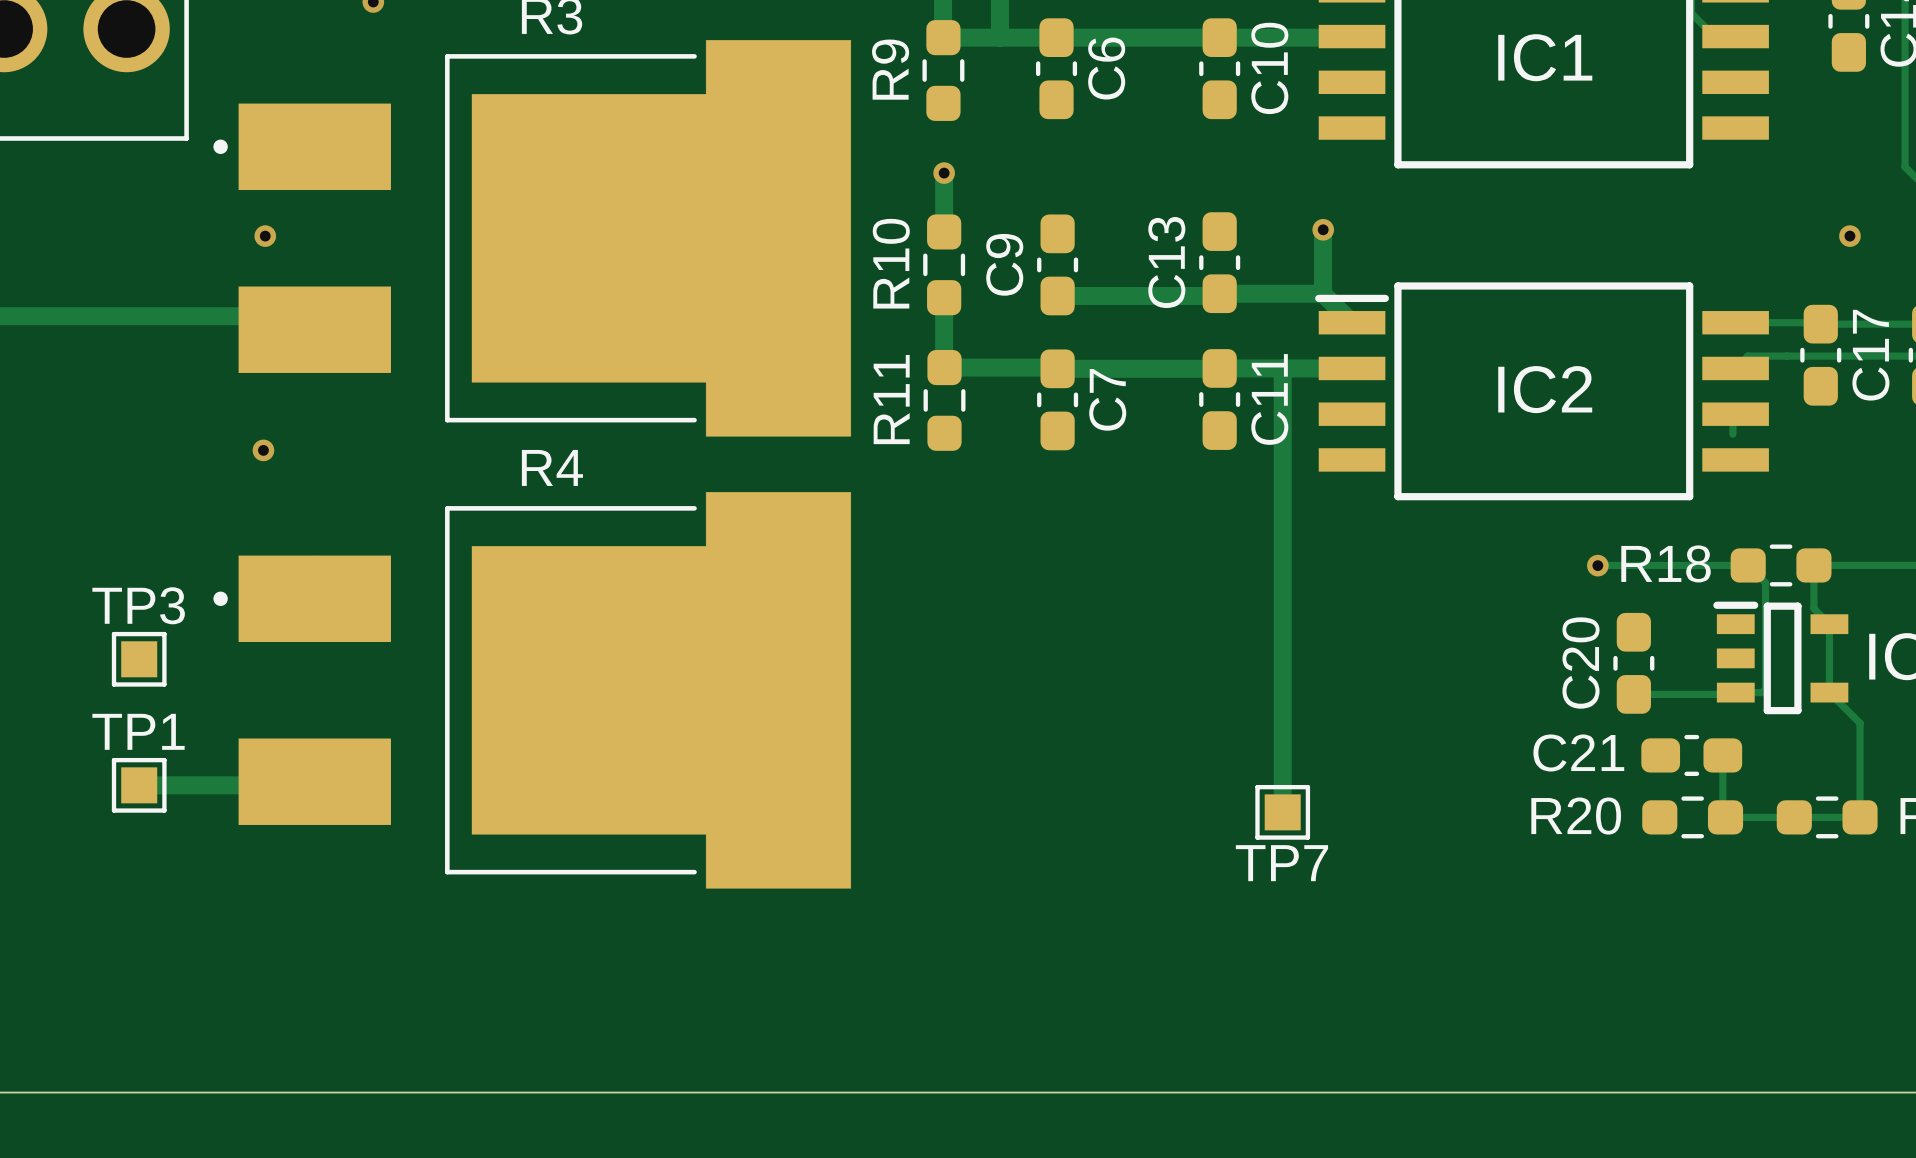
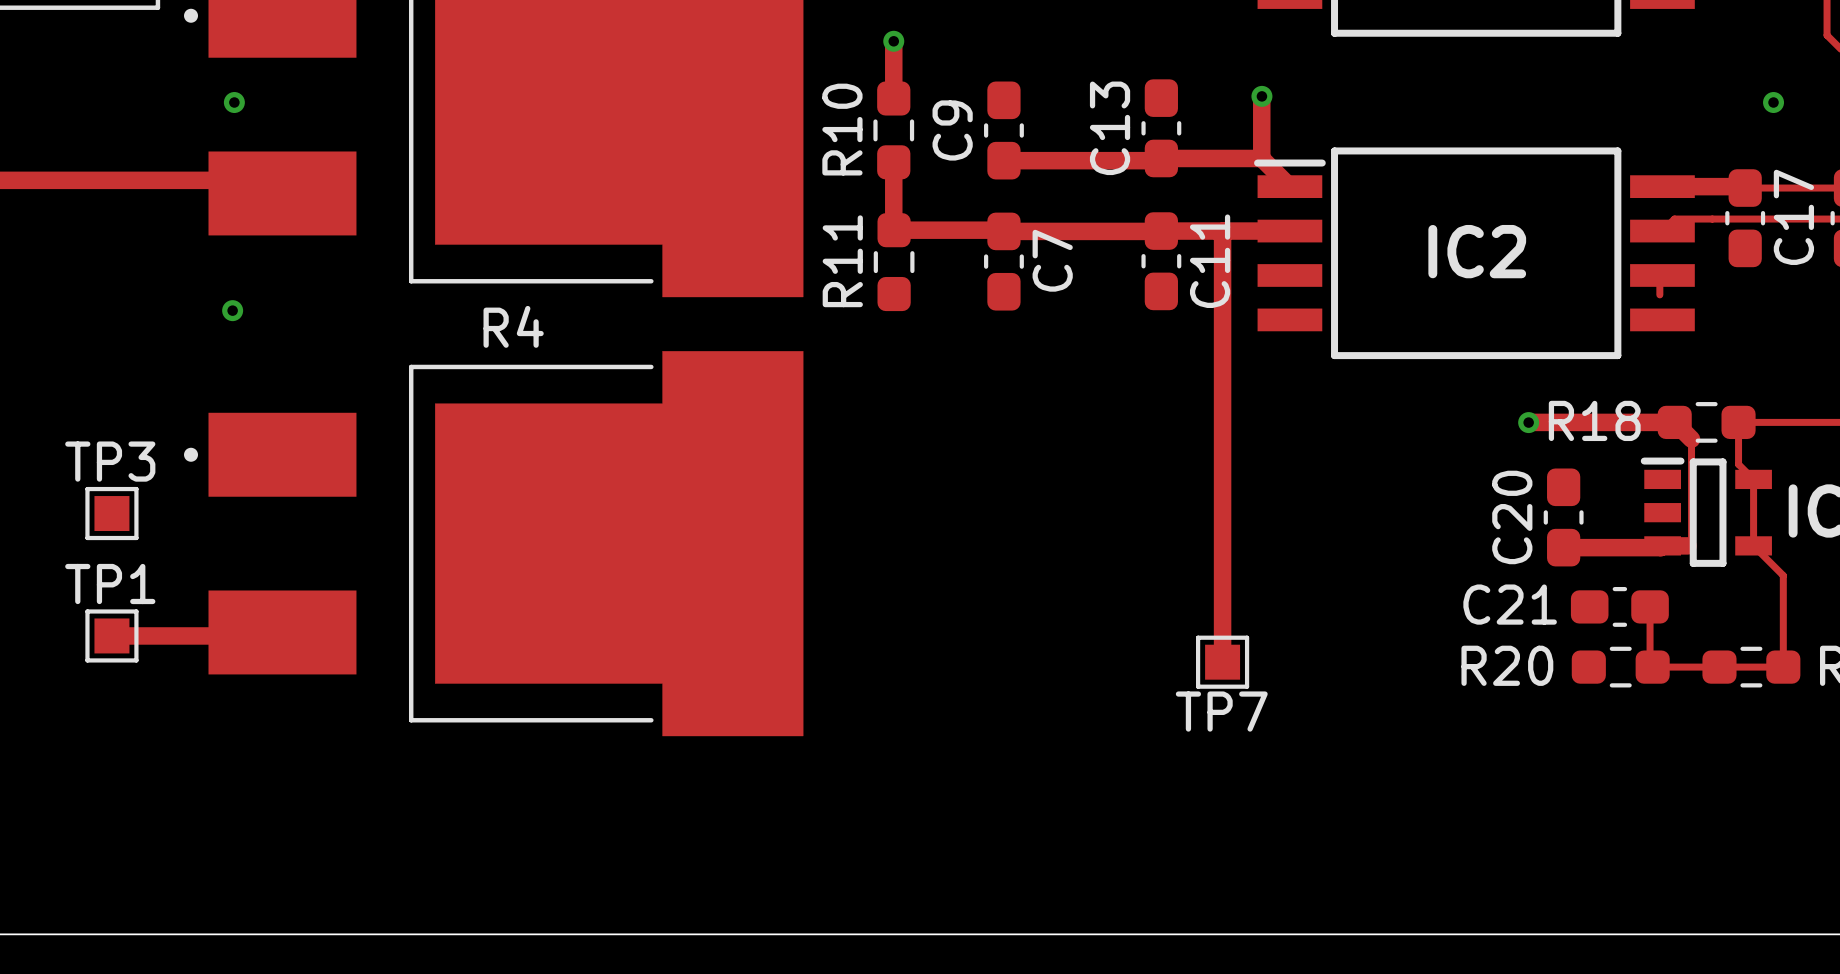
track width: thin (1735, 322) (1806, 322) -> thick (1662, 186) (1731, 186)
track width: thin (1598, 565) (1748, 565) (1765, 582) -> thick (1528, 422) (1674, 422) (1691, 439)
track width: thin (1761, 692) (1633, 694) -> thick (1688, 545) (1563, 547)

